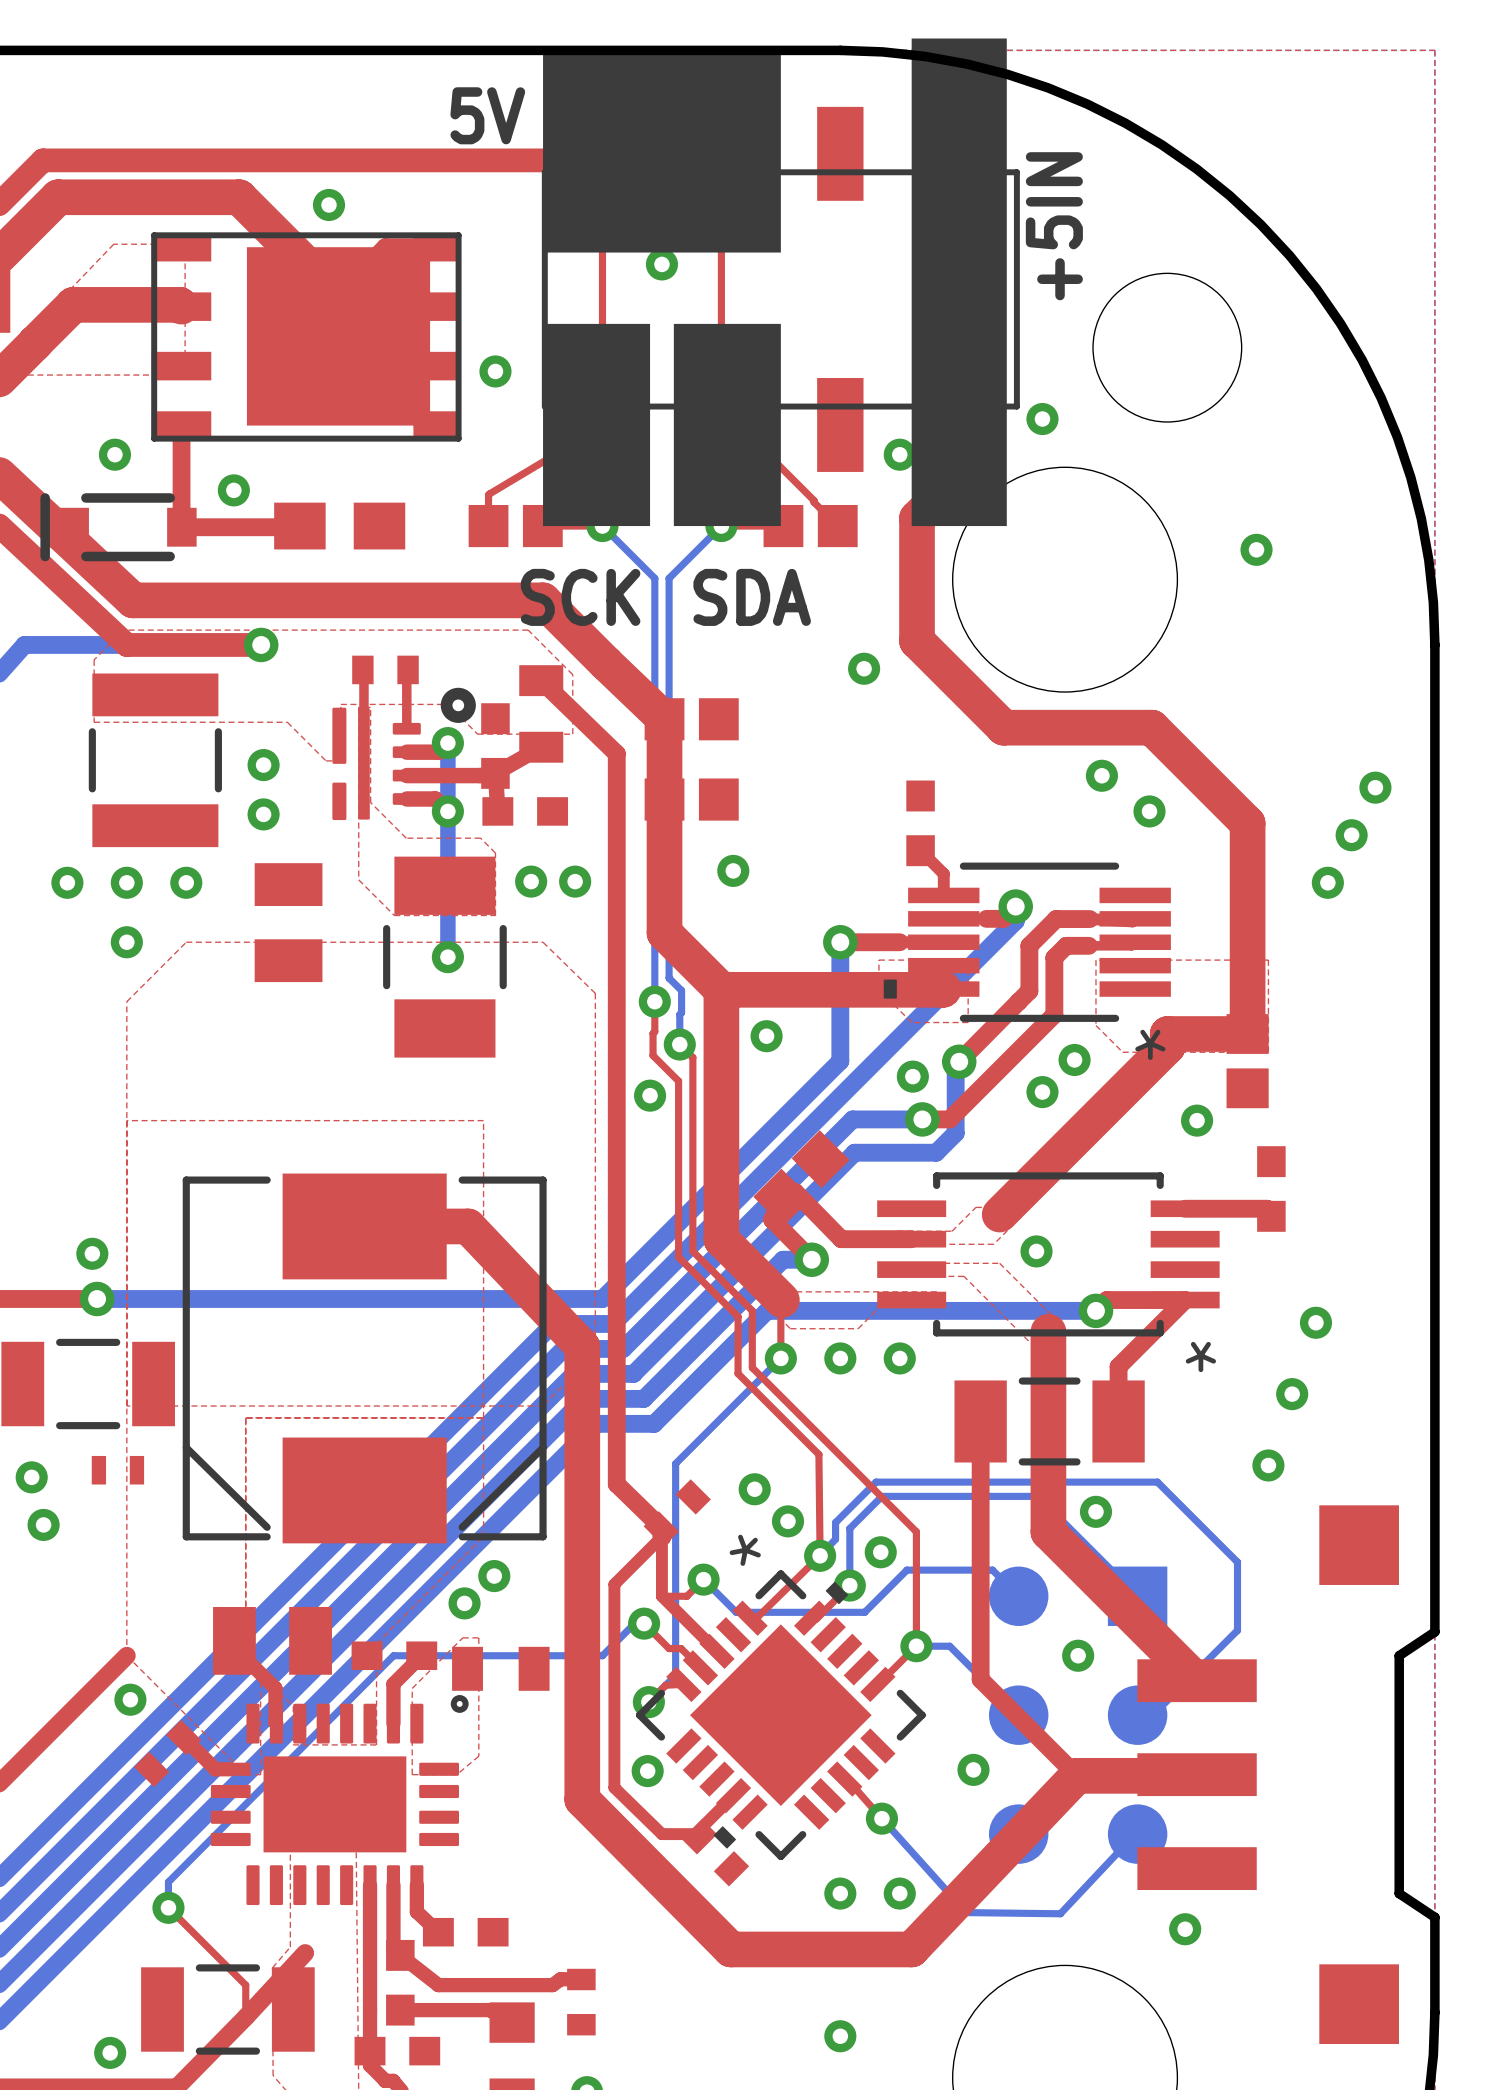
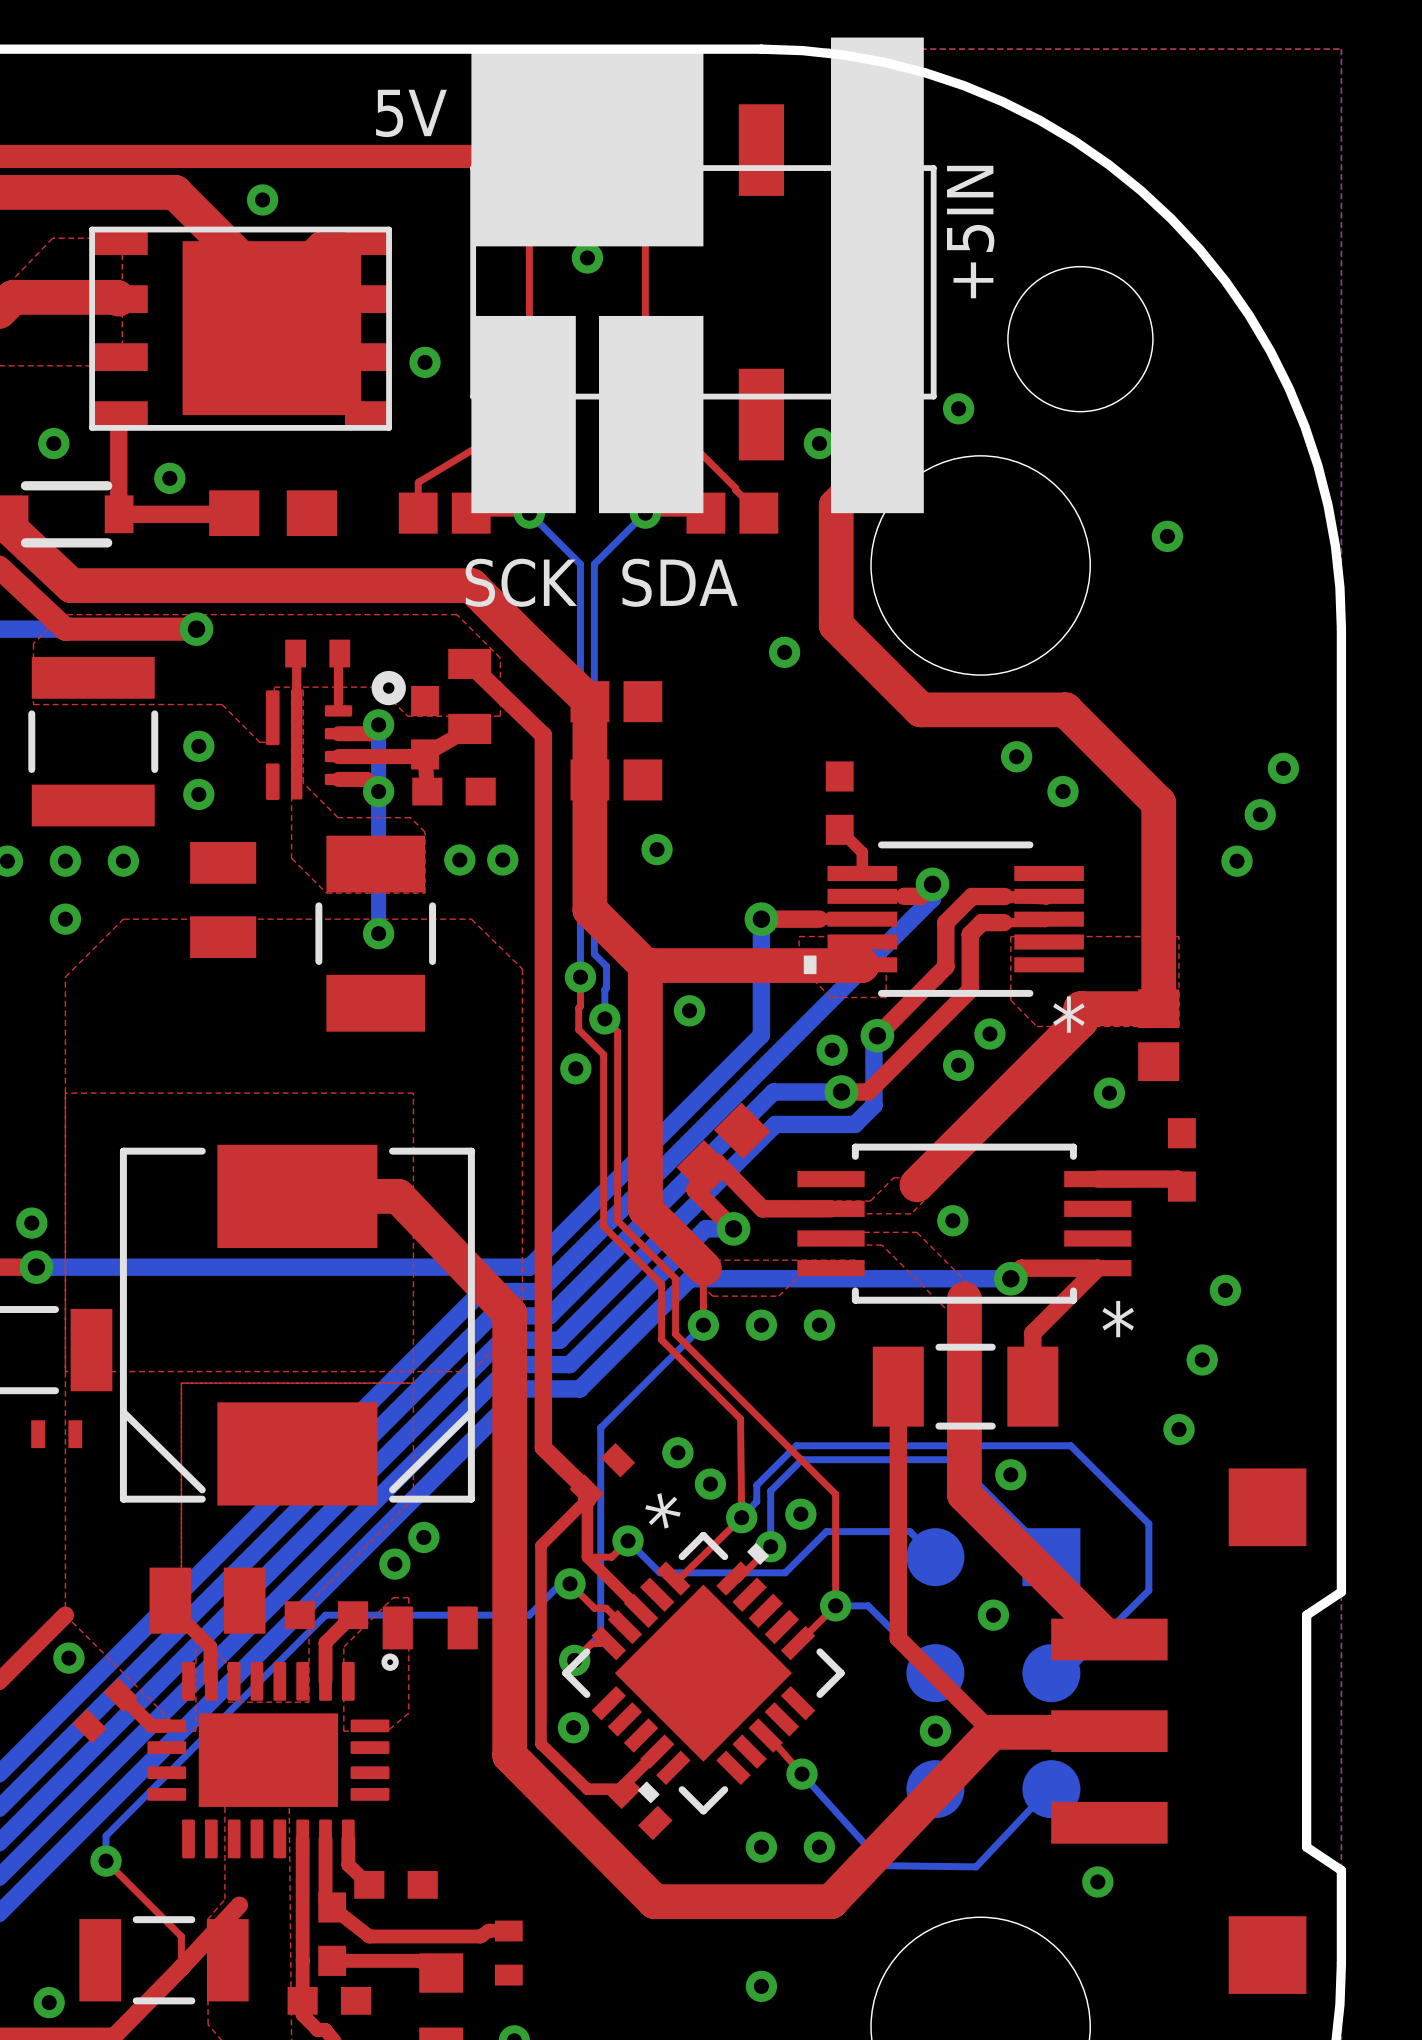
via position: (973, 1769) -> (935, 1731)

